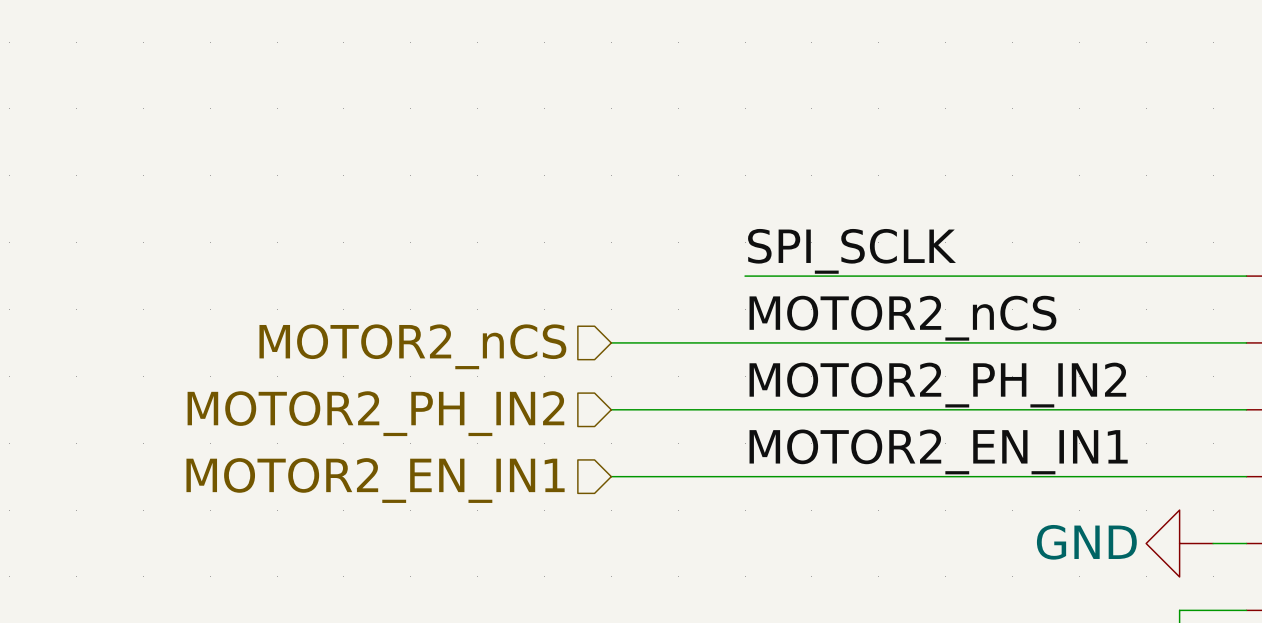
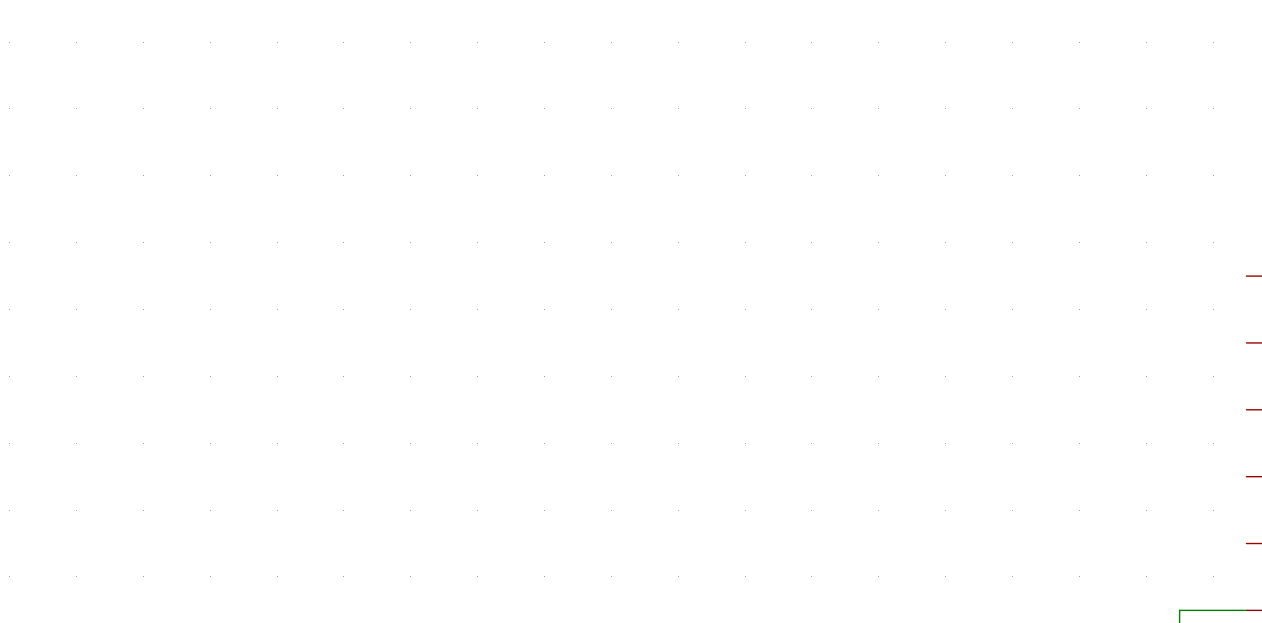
label: SPI_SCLK (851, 251) -> none
wire: (745, 276) (1246, 276) -> none
label: MOTOR2_nCS (902, 318) -> none
wire: (611, 342) (1246, 342) -> none
hierarchical label: MOTOR2_nCS (412, 346) -> none
label: MOTOR2_PH_IN2 (937, 385) -> none
wire: (611, 409) (1246, 409) -> none
hierarchical label: MOTOR2_PH_IN2 (375, 413) -> none
label: MOTOR2_EN_IN1 (938, 451) -> none
wire: (611, 476) (1246, 476) -> none
hierarchical label: MOTOR2_EN_IN1 (375, 480) -> none
power symbol: GND (1179, 543) -> none
wire: (1213, 543) (1246, 543) -> none

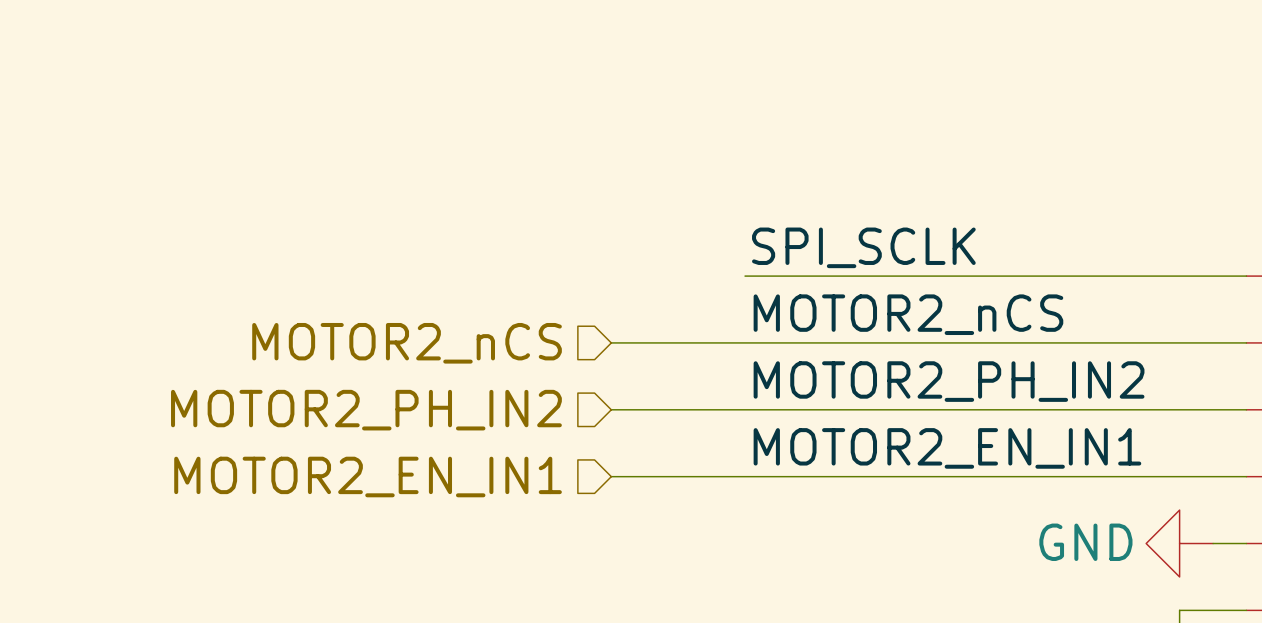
label: none -> SPI_SCLK (863, 247)
wire: none -> (745, 276) (1246, 276)
label: none -> MOTOR2_nCS (908, 314)
wire: none -> (611, 342) (1246, 342)
hierarchical label: none -> MOTOR2_nCS (407, 343)
label: none -> MOTOR2_PH_IN2 (949, 381)
wire: none -> (611, 409) (1246, 409)
hierarchical label: none -> MOTOR2_PH_IN2 (366, 410)
label: none -> MOTOR2_EN_IN1 (947, 448)
wire: none -> (611, 476) (1246, 476)
hierarchical label: none -> MOTOR2_EN_IN1 (368, 477)
power symbol: none -> GND (1179, 543)
wire: none -> (1213, 543) (1246, 543)

